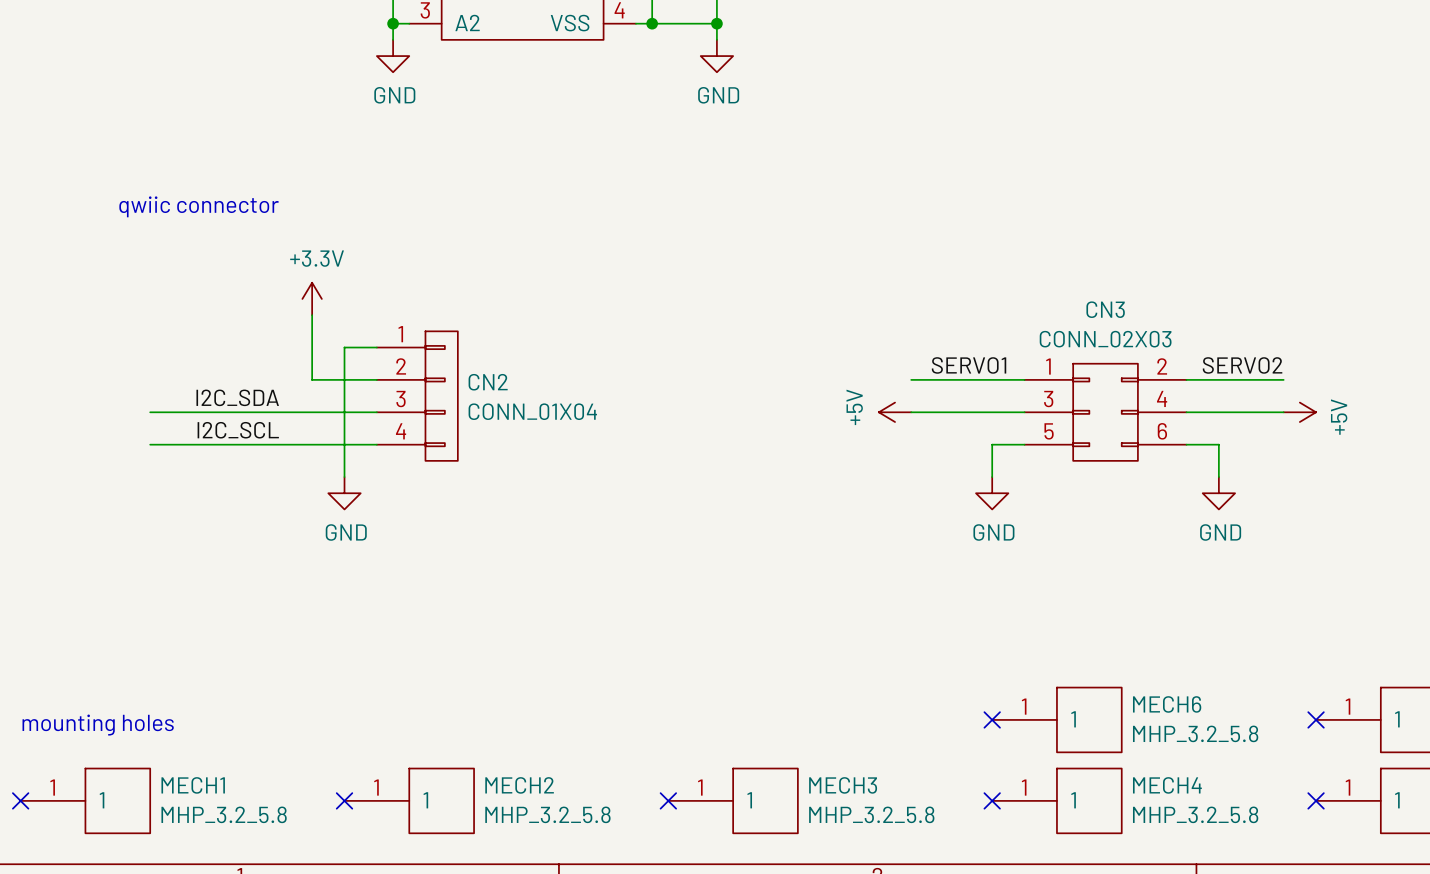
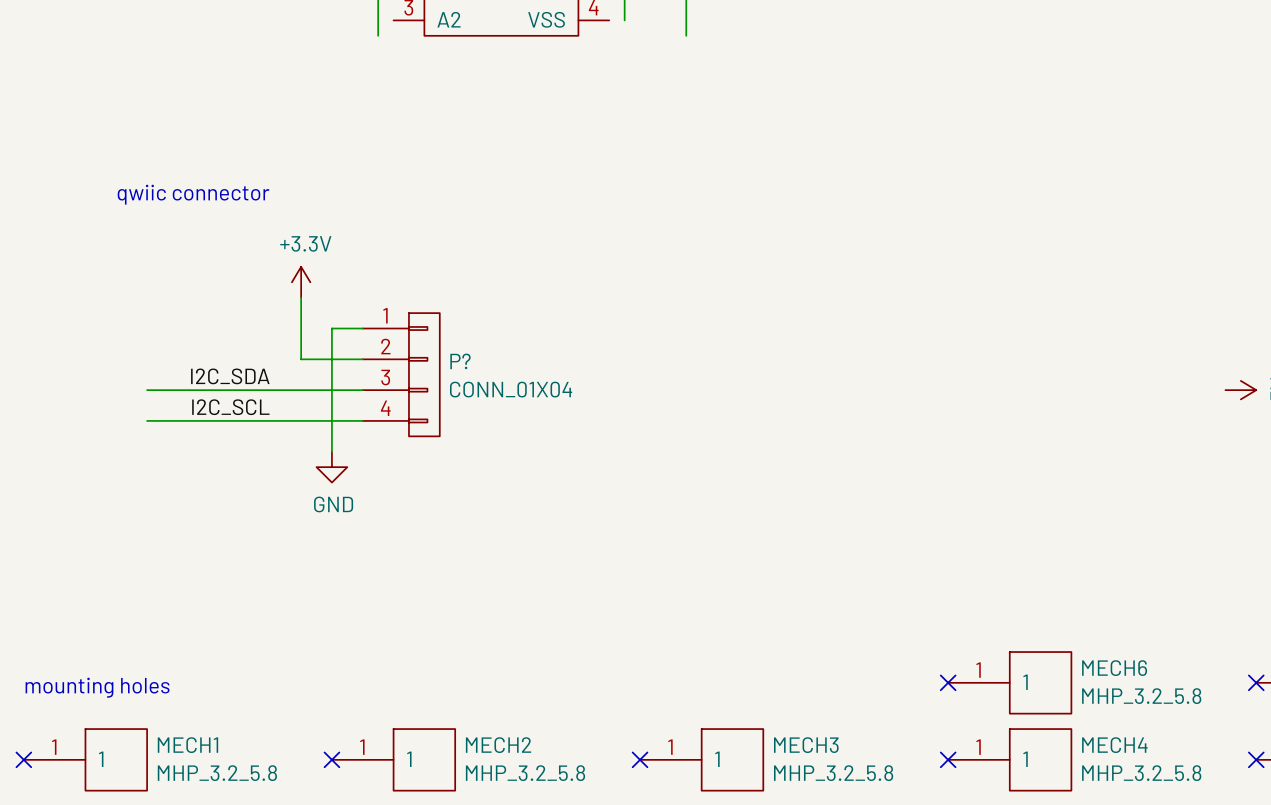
wire: (393, 23) (409, 23) -> none
junction: (393, 23) -> none
wire: (635, 23) (716, 23) -> none
junction: (652, 23) -> none
junction: (716, 23) -> none
power symbol: GND (393, 56) -> none
power symbol: GND (716, 56) -> none
label: SERVO1 (969, 365) -> none
label: SERVO2 (1242, 365) -> none
wire: (911, 379) (1024, 379) -> none
wire: (1186, 379) (1283, 379) -> none
CN2 name: CN2 (488, 382) -> P? (460, 361)
power symbol: +5V (895, 412) -> none
wire: (911, 412) (1024, 412) -> none
CN3: CONN_02X03 (1105, 412) -> none
wire: (1186, 412) (1283, 412) -> none
wire: (1024, 444) (992, 444) (992, 477) -> none
wire: (1186, 444) (1218, 444) (1218, 477) -> none
power symbol: GND (992, 493) -> none
power symbol: GND (1218, 493) -> none

